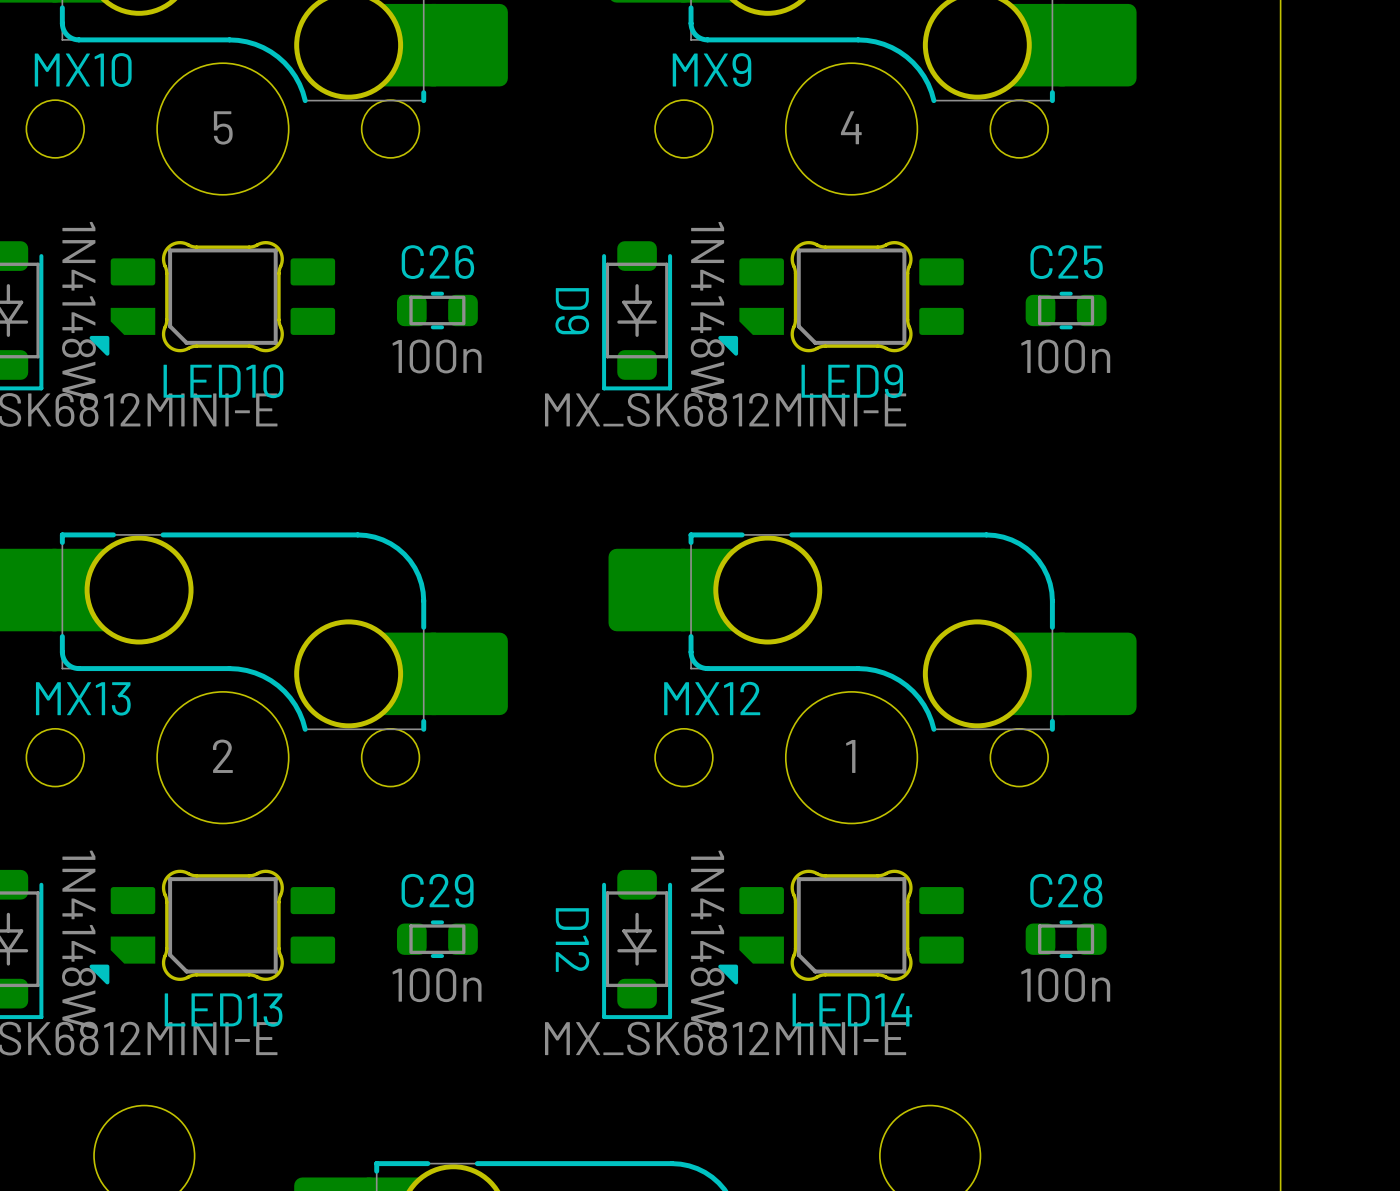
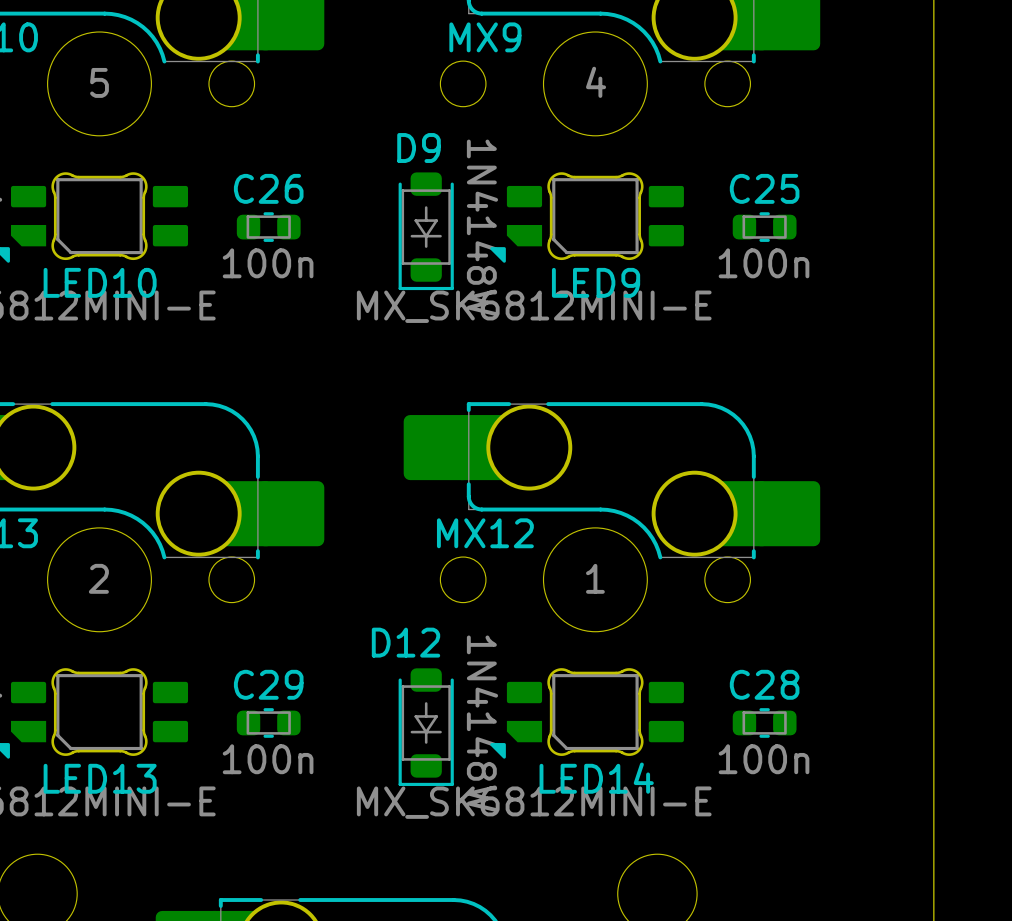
D9 name rotation: 0° (572, 311) -> 90° counterclockwise (419, 148)
D9 name position: D9 (572, 311) -> D9 (419, 148)
D12 name rotation: 0° (572, 940) -> 90° counterclockwise (406, 642)

